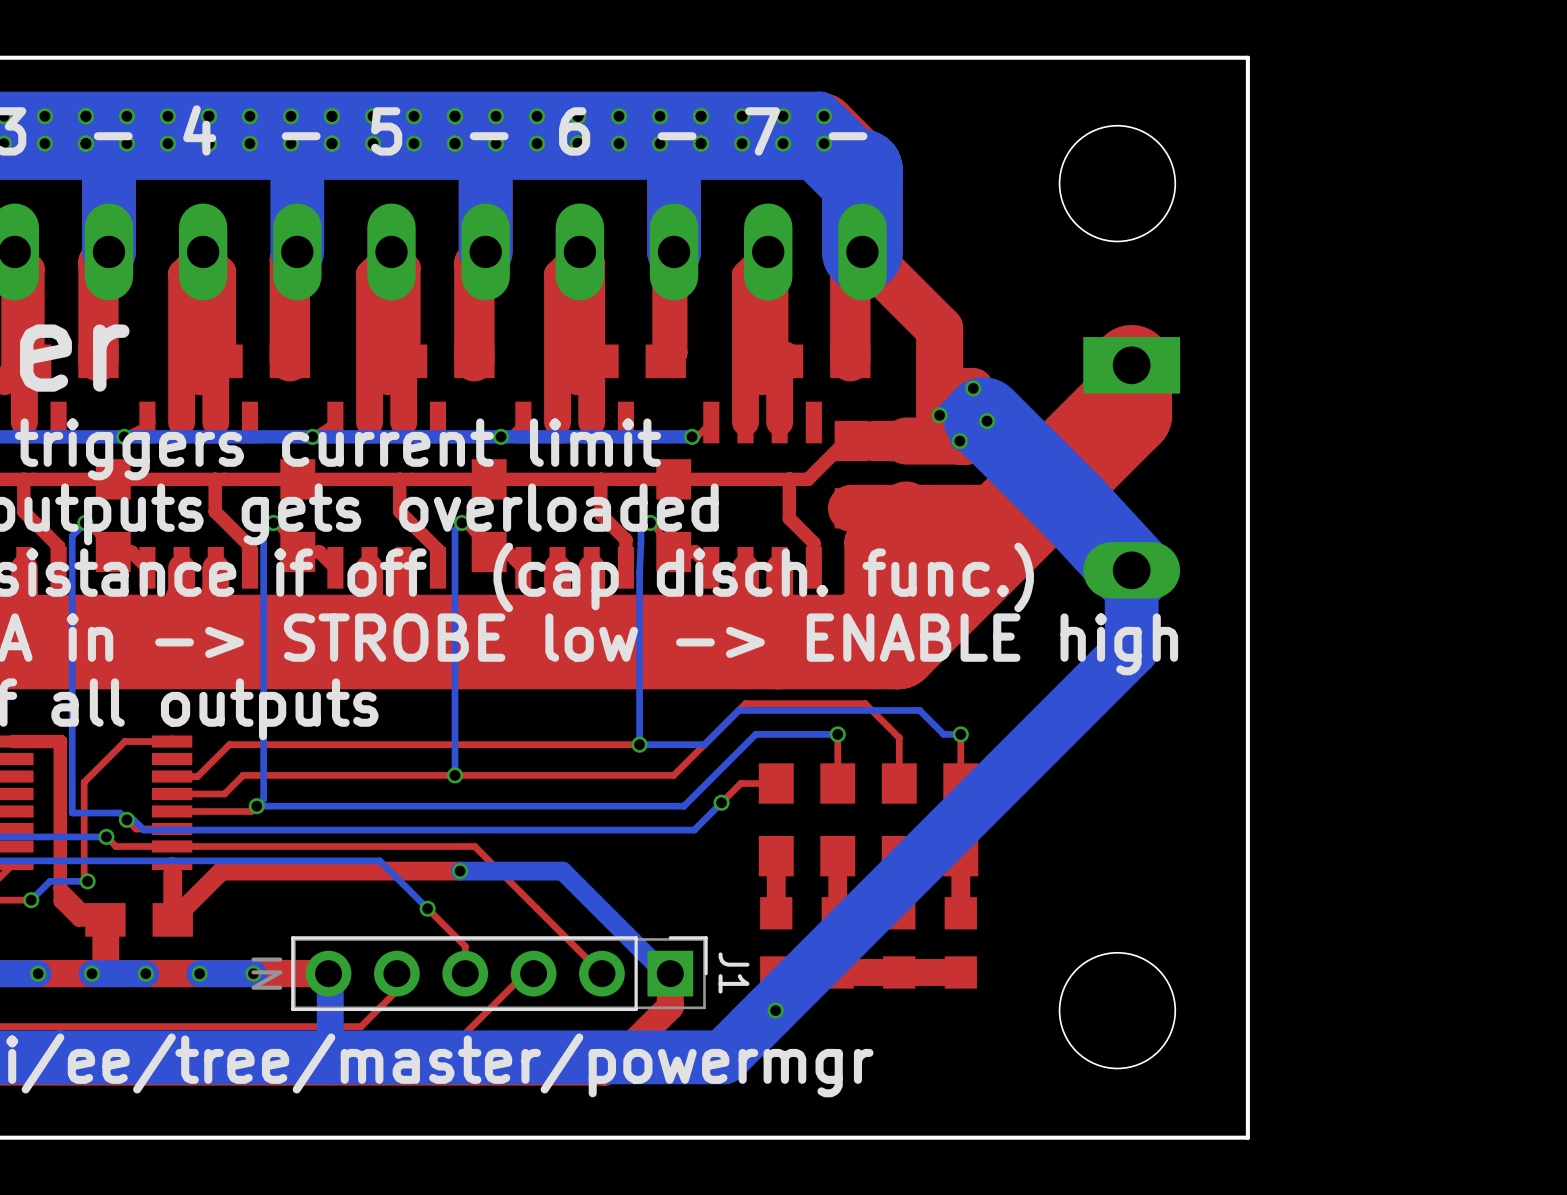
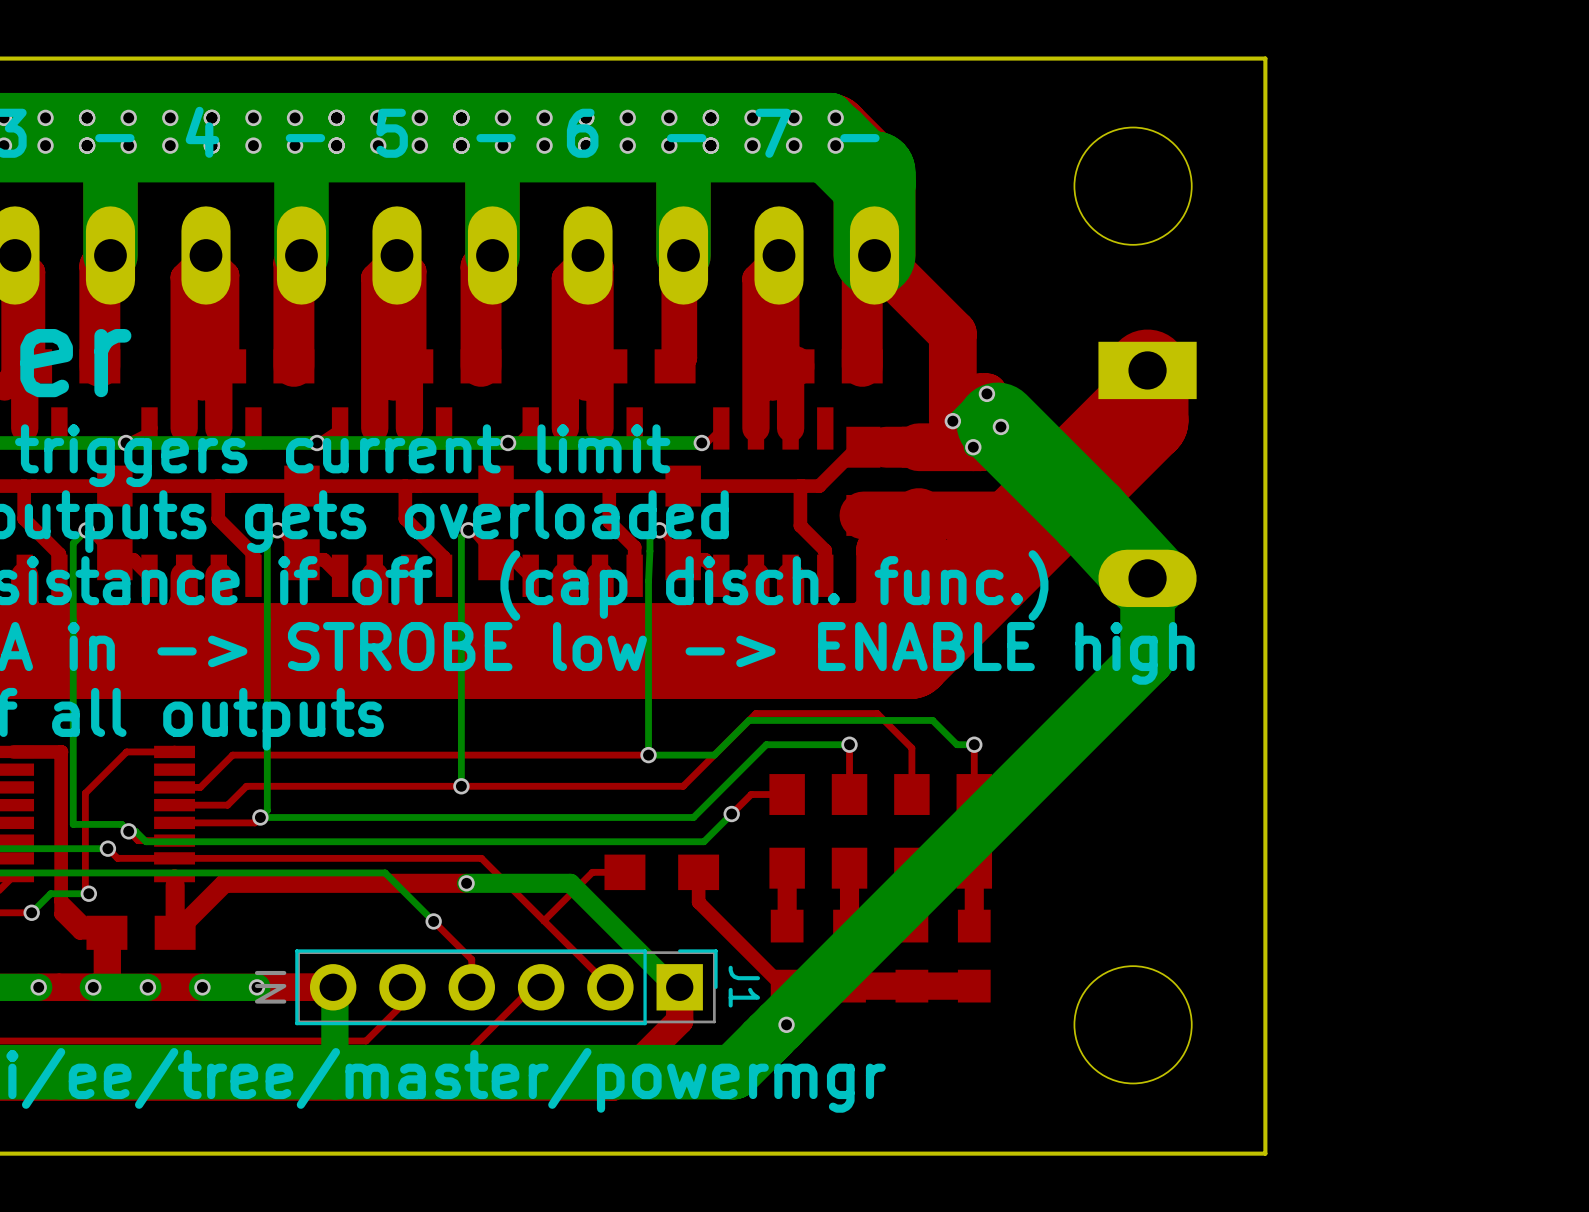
top track: none -> (624, 872) (592, 872) (543, 920)
part: none -> (661, 872)
top track: none -> (698, 872) (698, 902) (782, 986)

